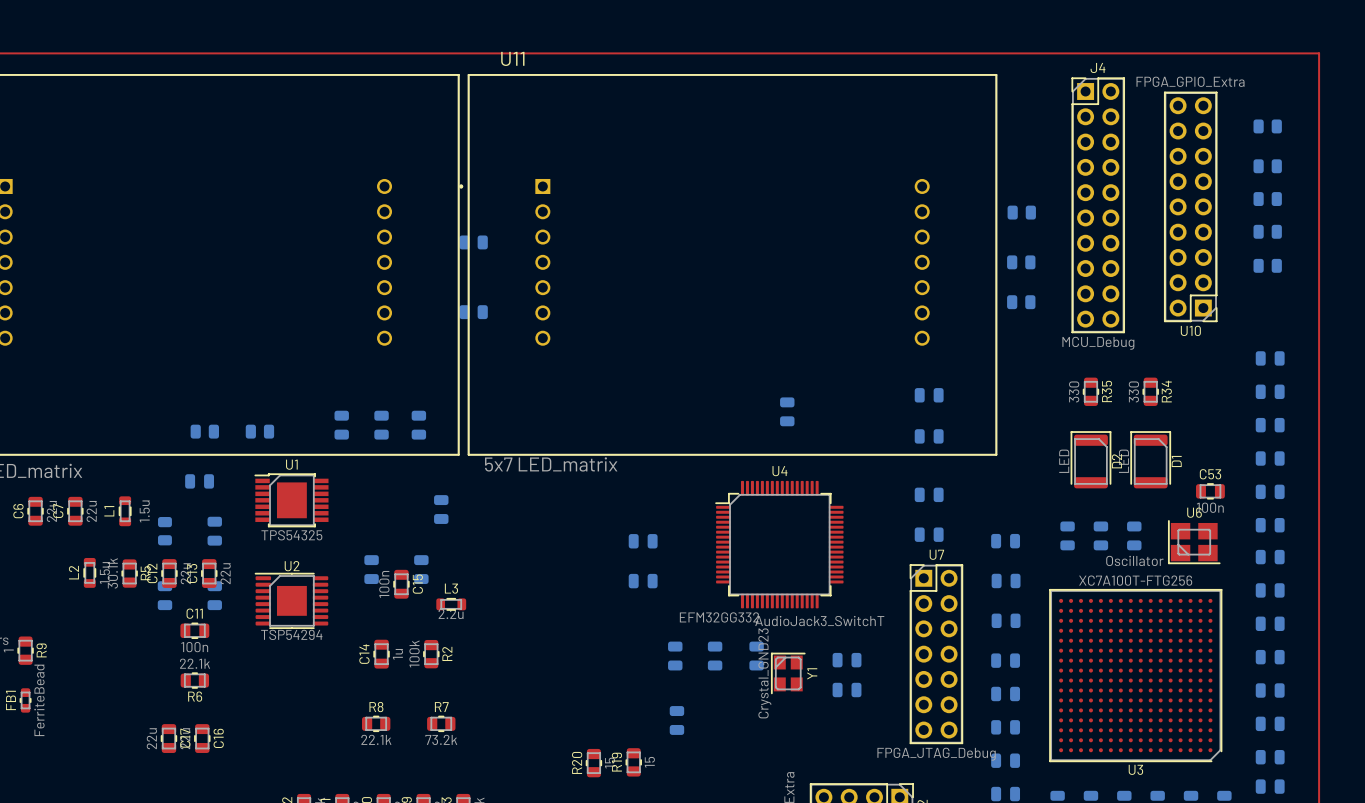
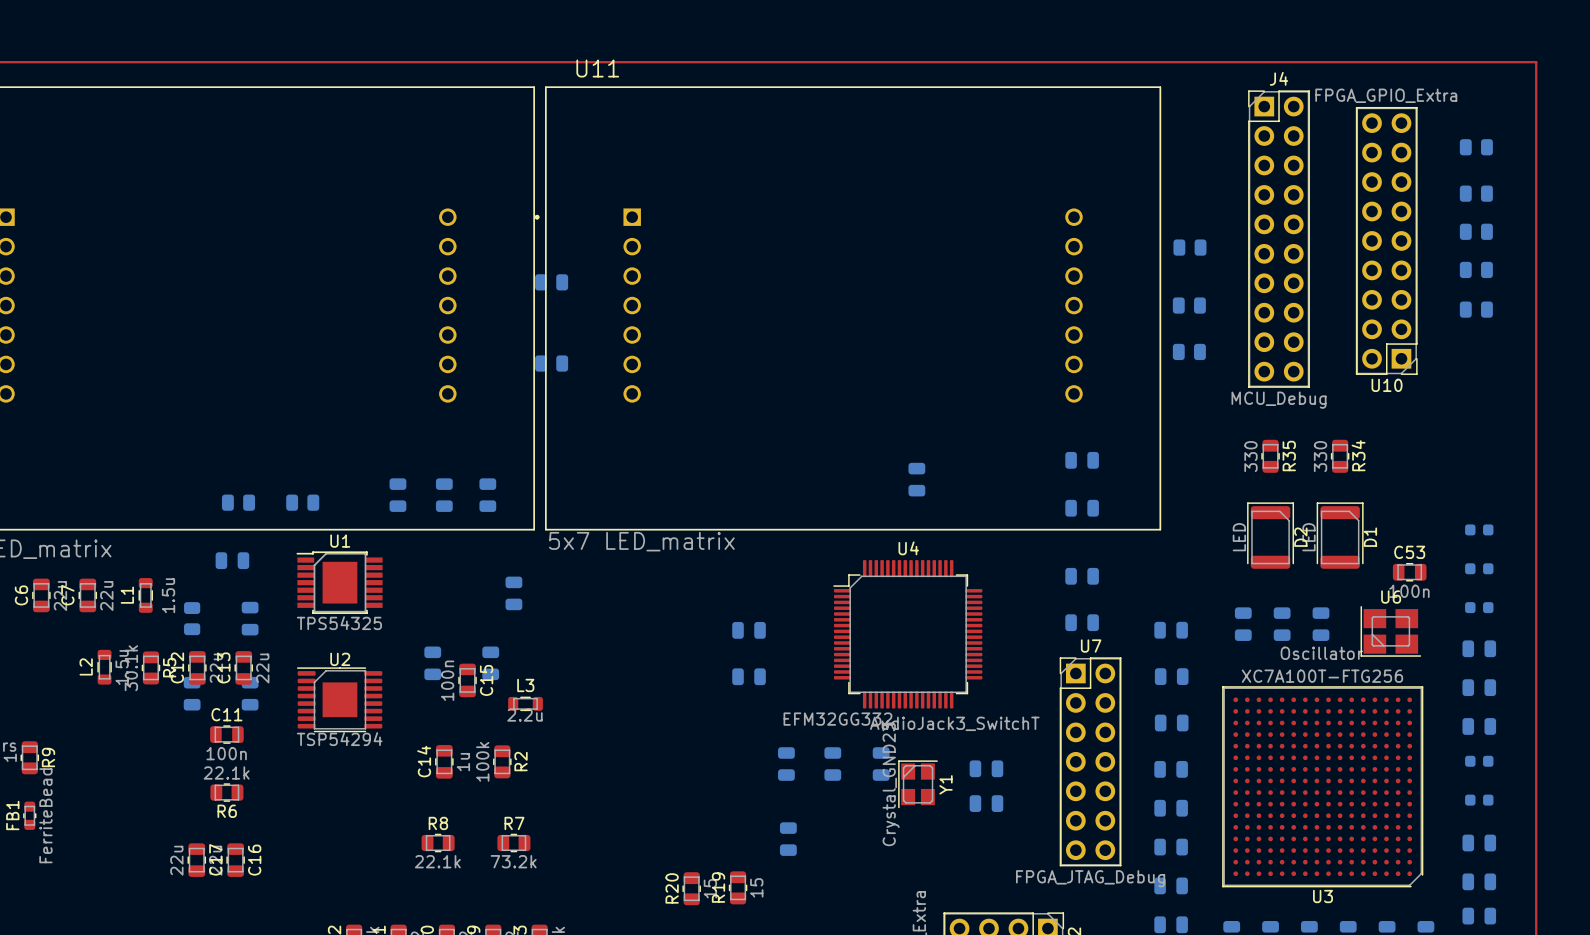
part: (1270, 358) -> none
part: (1270, 391) -> none
part: (1270, 425) -> none
part footprint: [1255, 451, 1285, 466] -> [1465, 524, 1494, 536]
part footprint: [1255, 484, 1285, 500] -> [1465, 563, 1494, 575]
part footprint: [1255, 518, 1285, 533] -> [1465, 602, 1494, 614]
part footprint: [1255, 649, 1285, 665] -> [1465, 755, 1494, 767]
part footprint: [1255, 683, 1285, 698] -> [1465, 794, 1494, 806]

